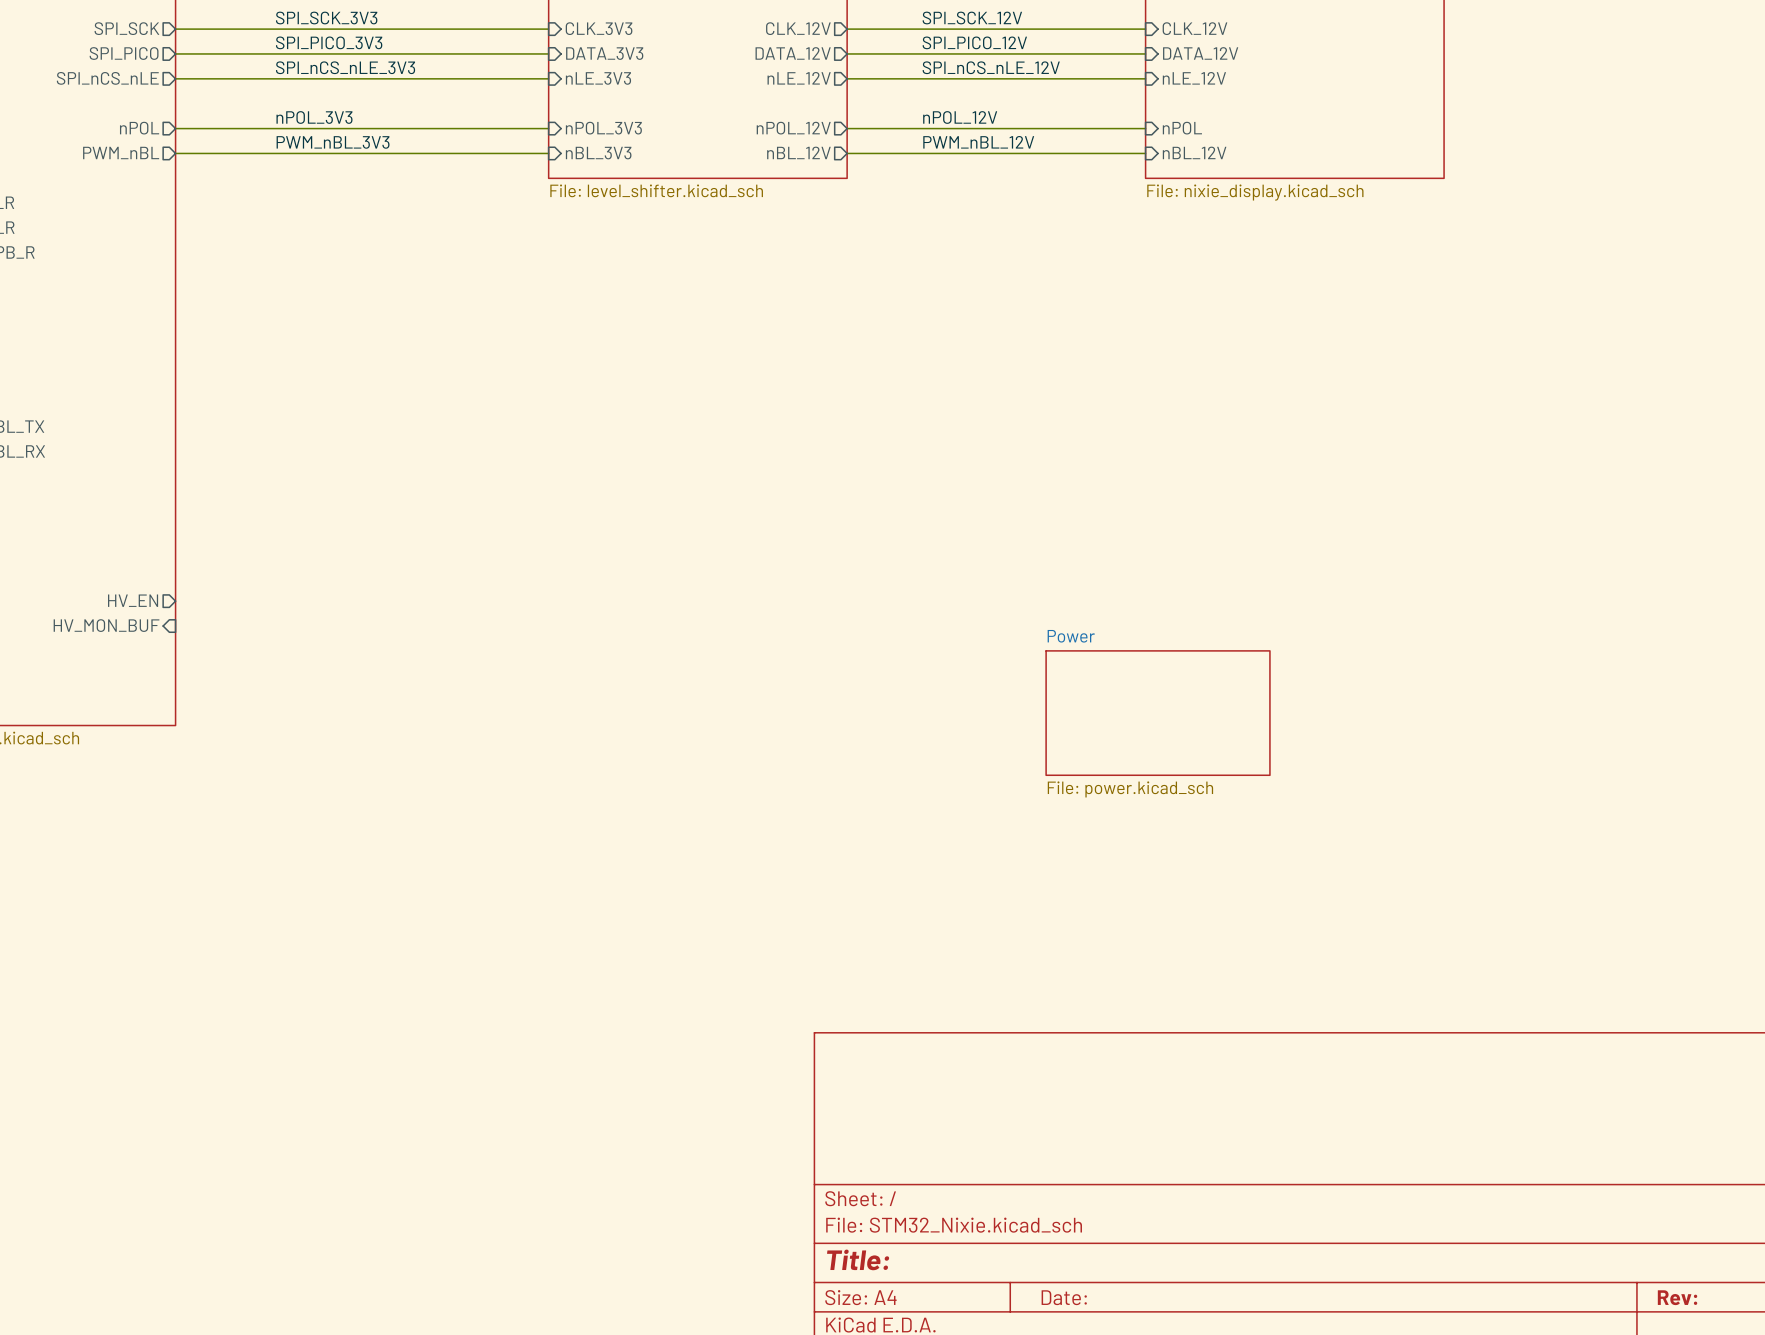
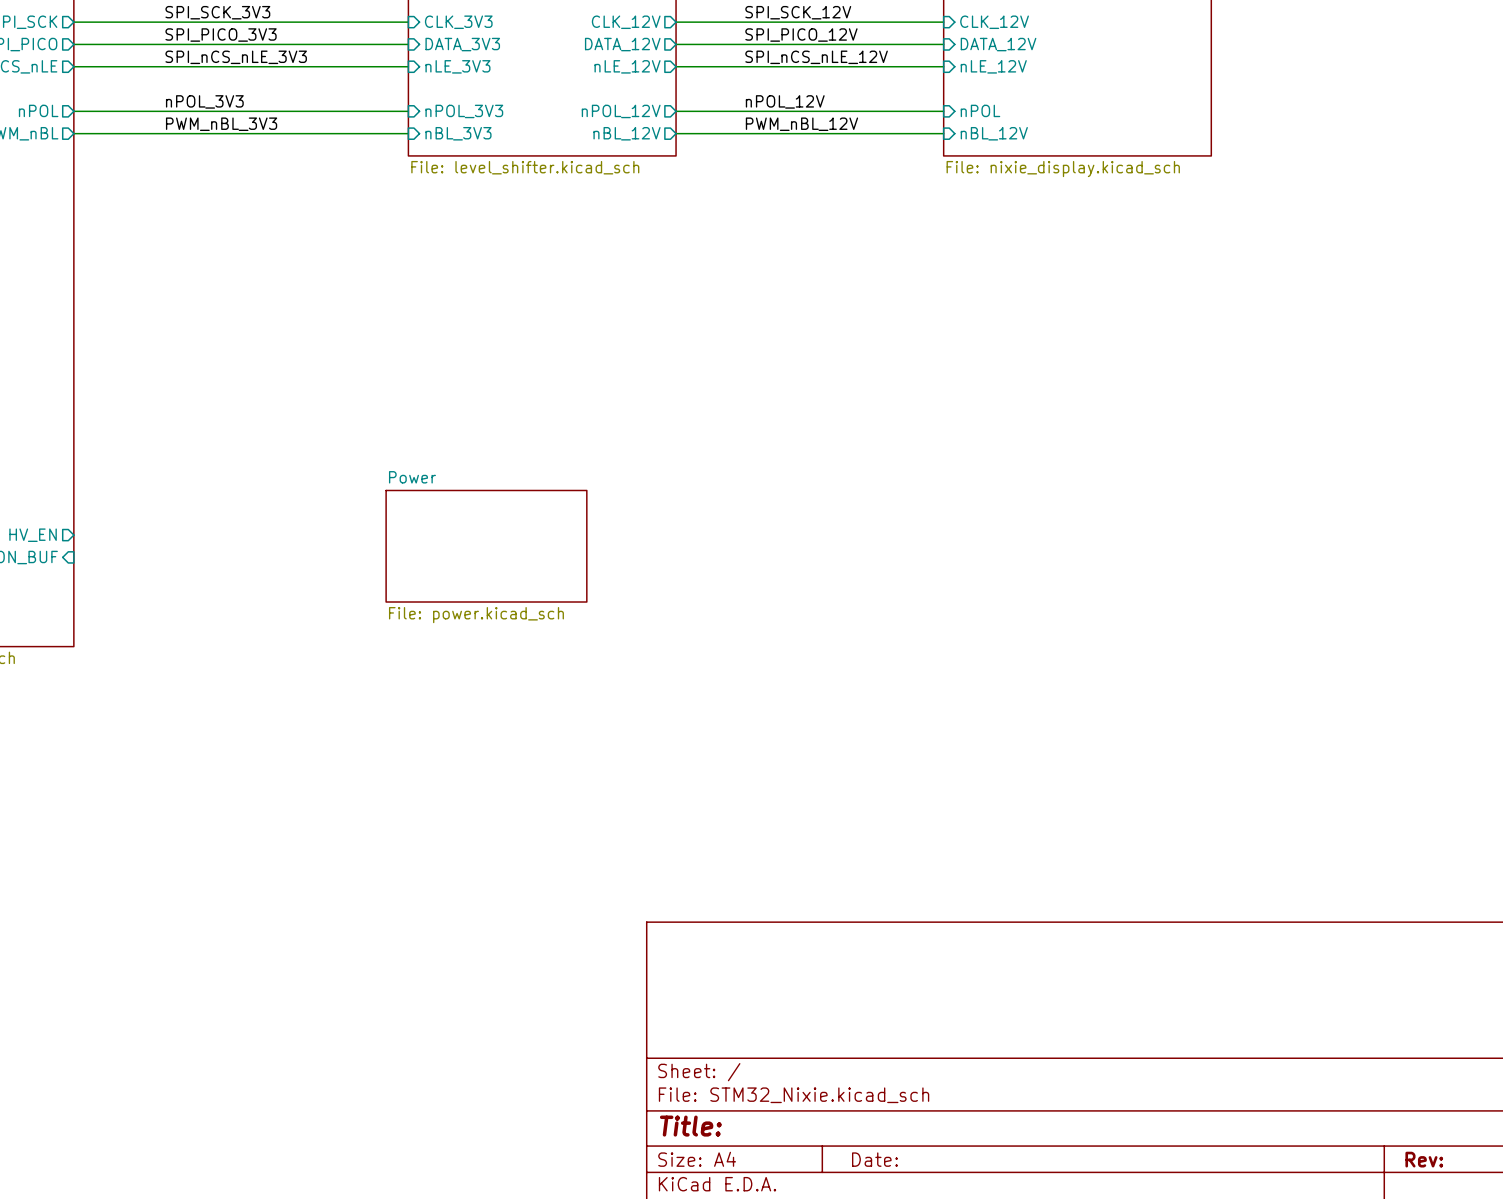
sheet Power: none -> File: power.kicad_sch (486, 546)
sheet Power: File: power.kicad_sch (1158, 713) -> none

